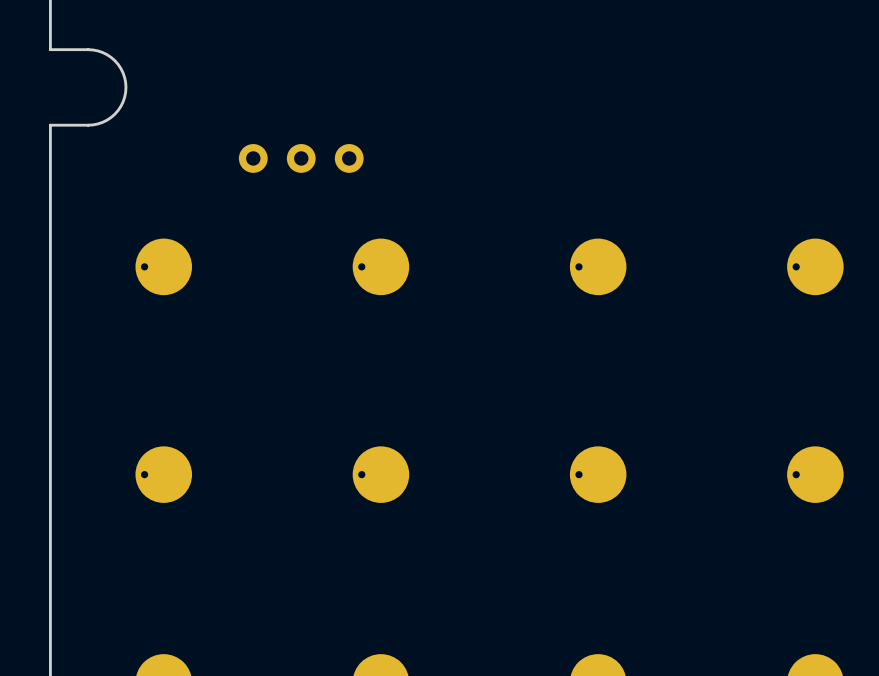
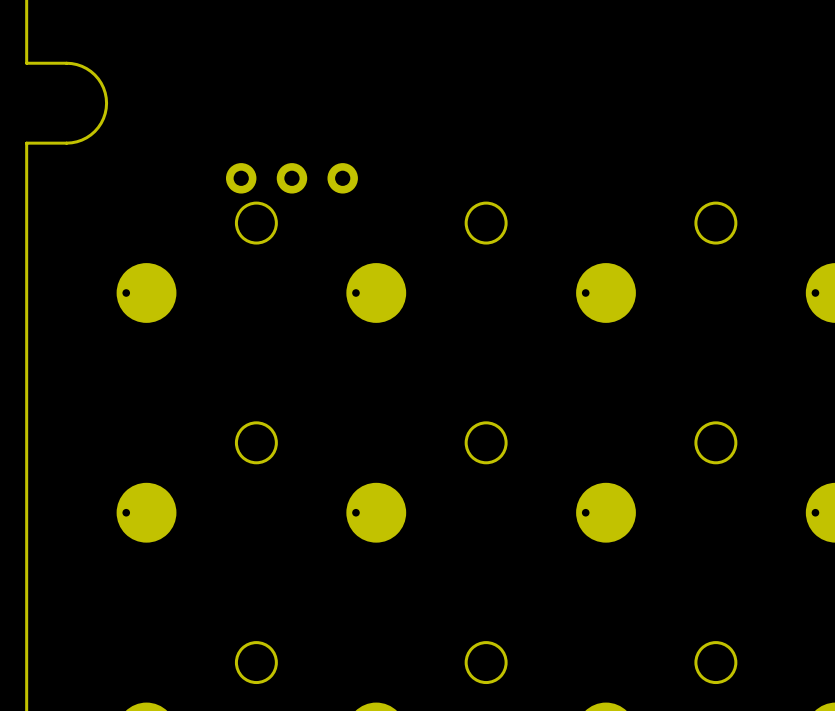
round board edge: none -> [234, 201, 278, 245]
round board edge: none -> [464, 201, 508, 245]
round board edge: none -> [694, 201, 738, 245]
round board edge: none -> [234, 421, 278, 465]
round board edge: none -> [464, 421, 508, 465]
round board edge: none -> [694, 421, 738, 465]
round board edge: none -> [234, 641, 278, 685]
round board edge: none -> [464, 641, 508, 685]
round board edge: none -> [694, 641, 738, 685]

